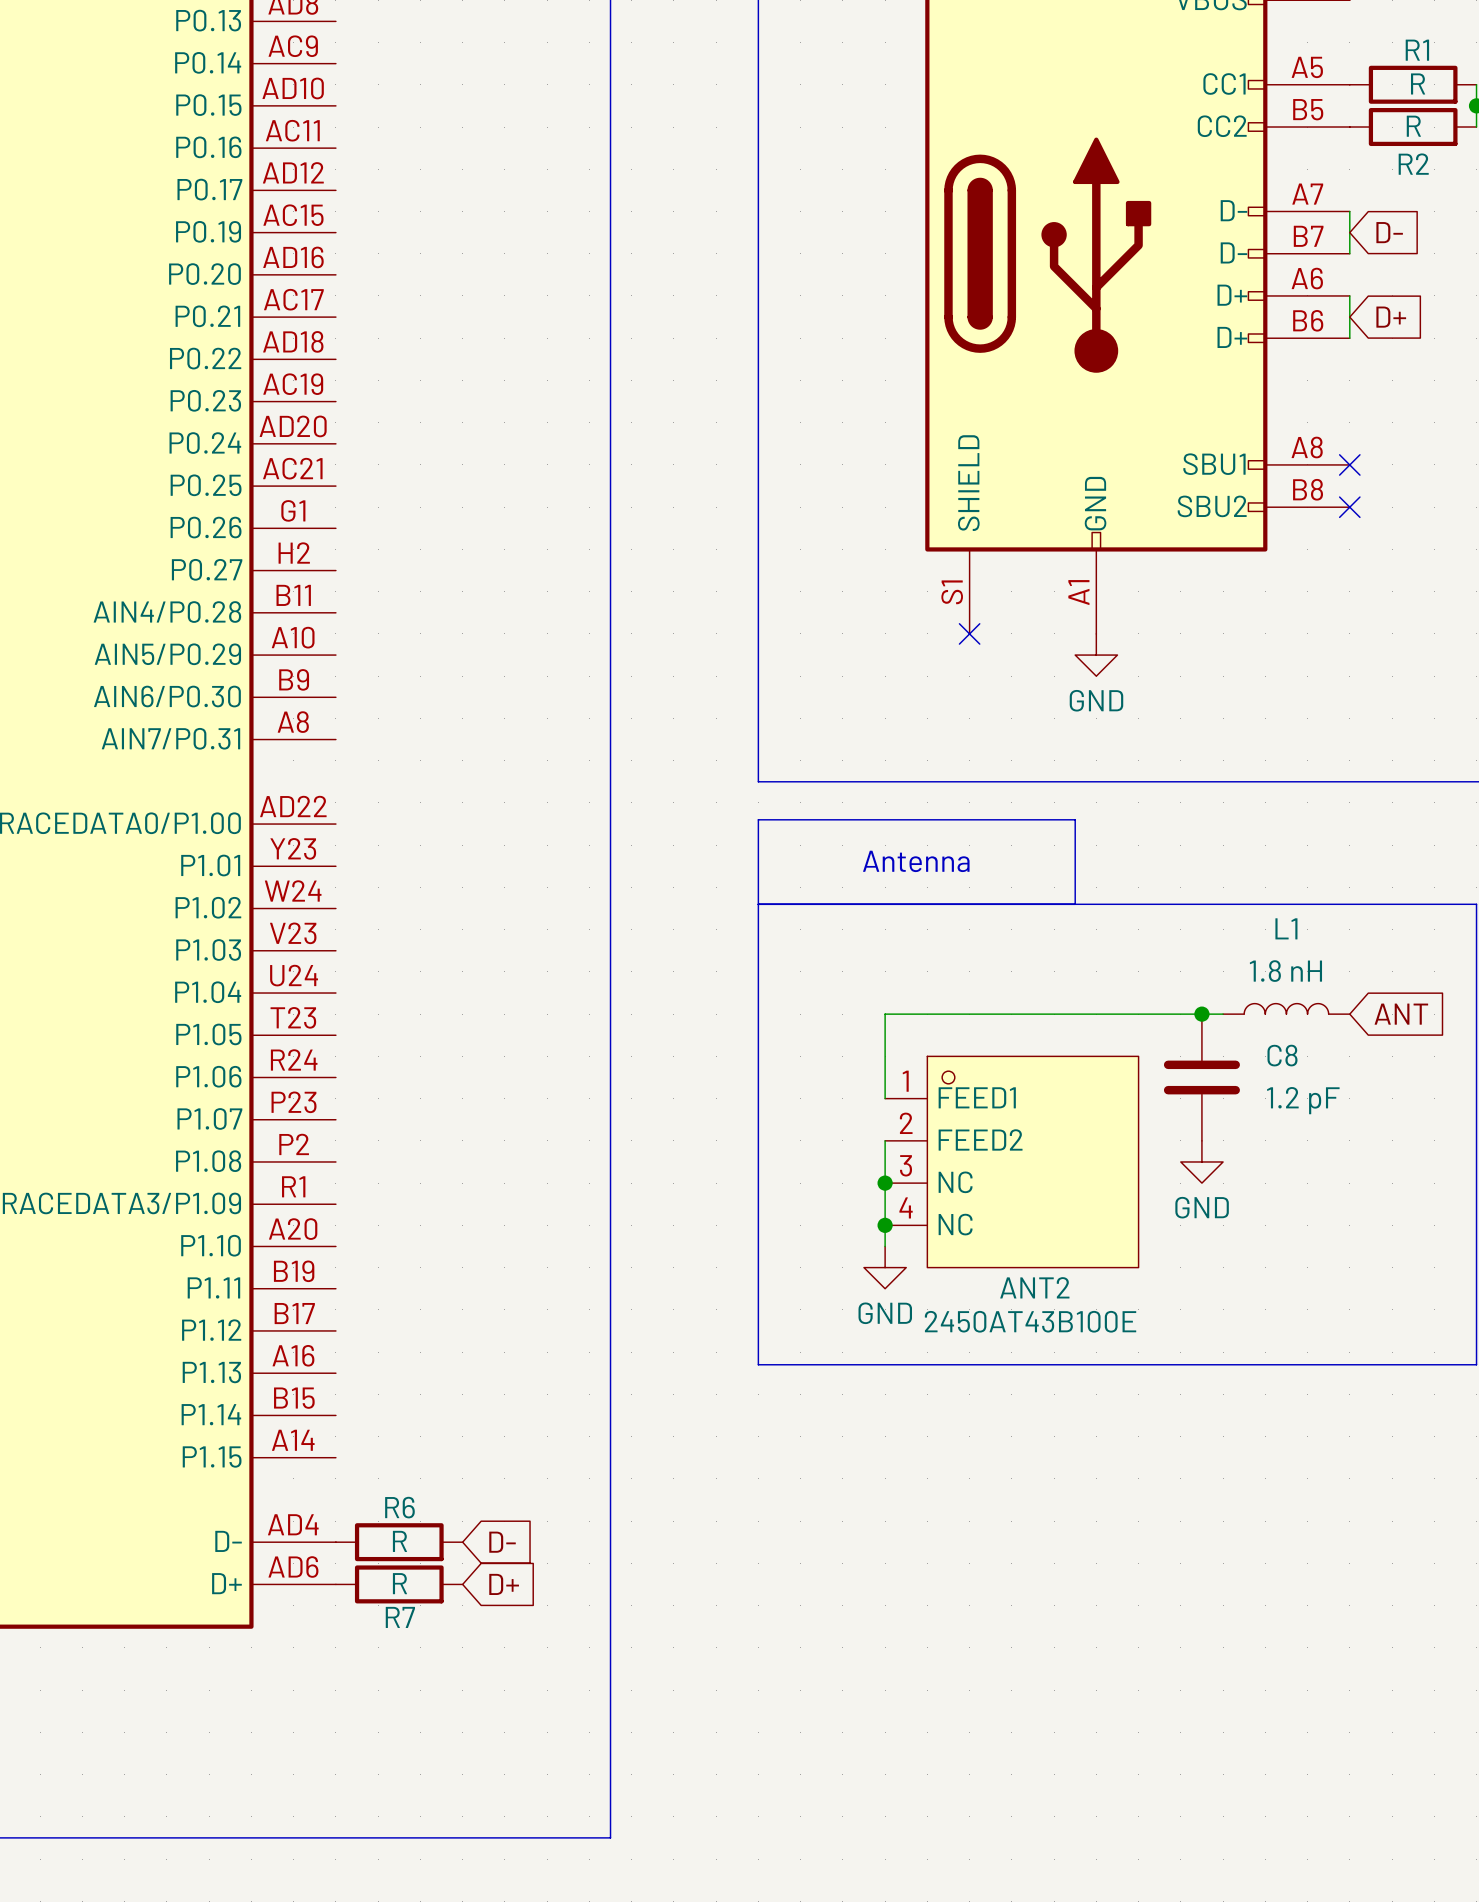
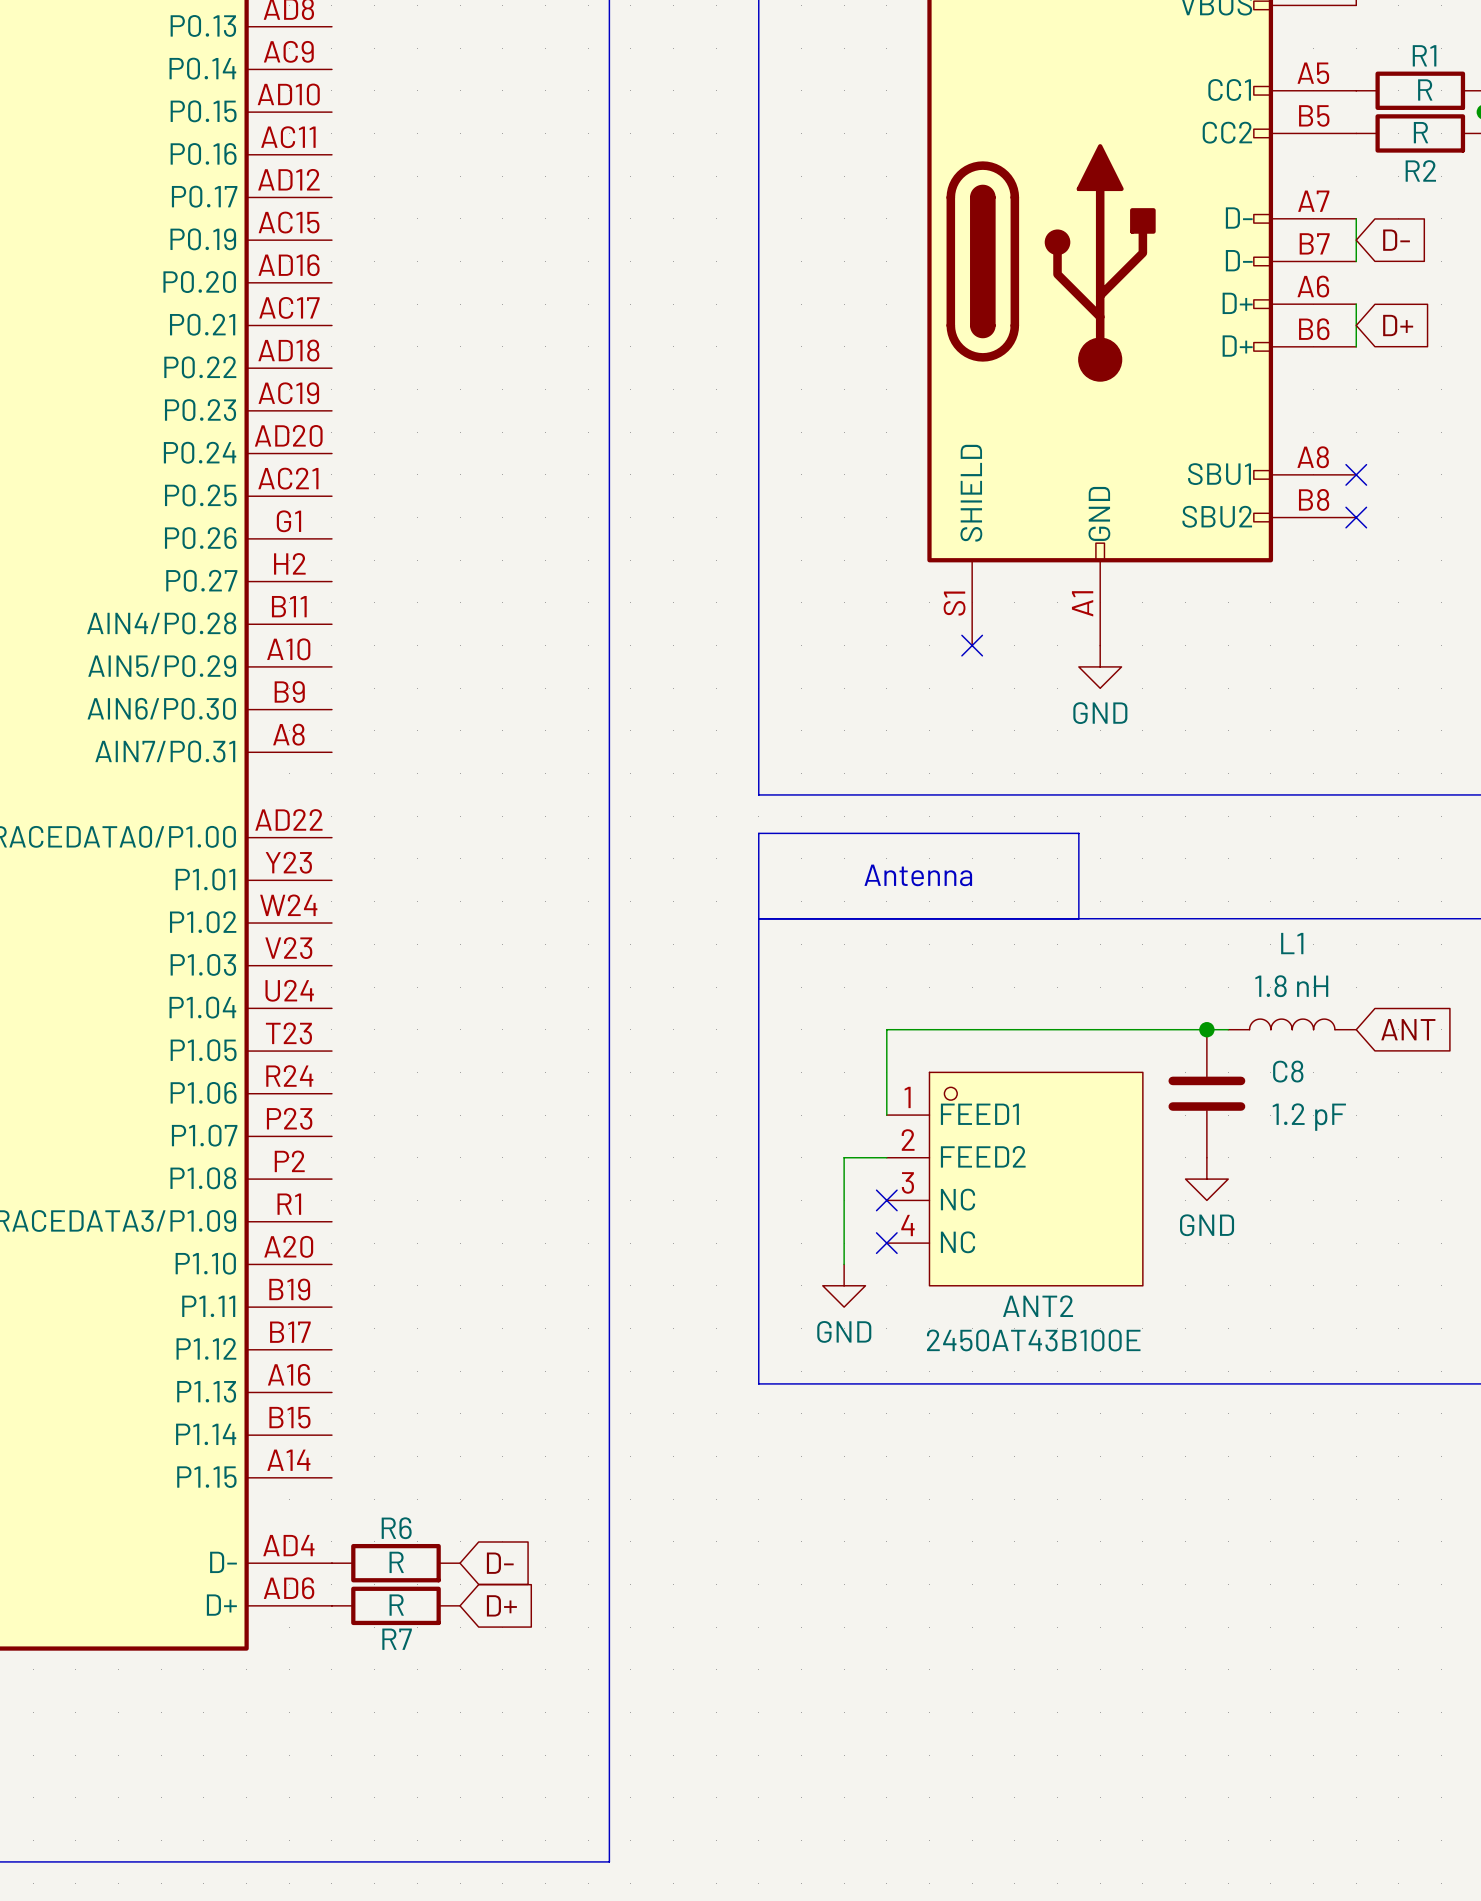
wire: (885, 1140) (885, 1246) -> (886, 1157) (844, 1157) (844, 1264)
junction: (885, 1183) -> none
no-connect mark: none -> (886, 1200)
junction: (885, 1225) -> none
no-connect mark: none -> (886, 1243)
power symbol position: GND (885, 1267) -> GND (844, 1285)

